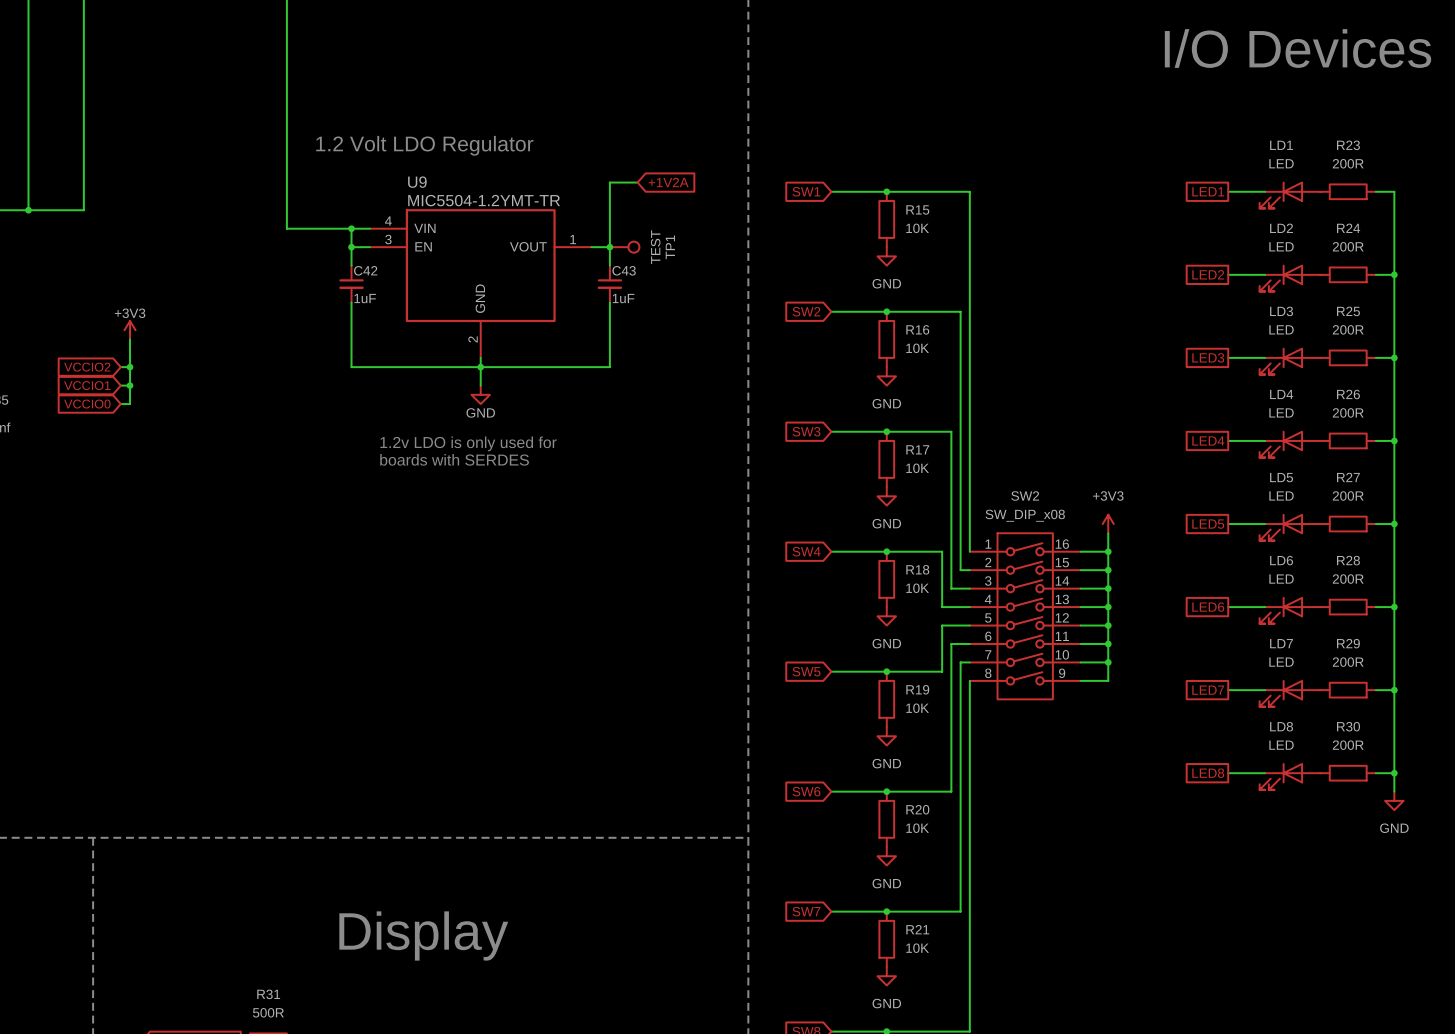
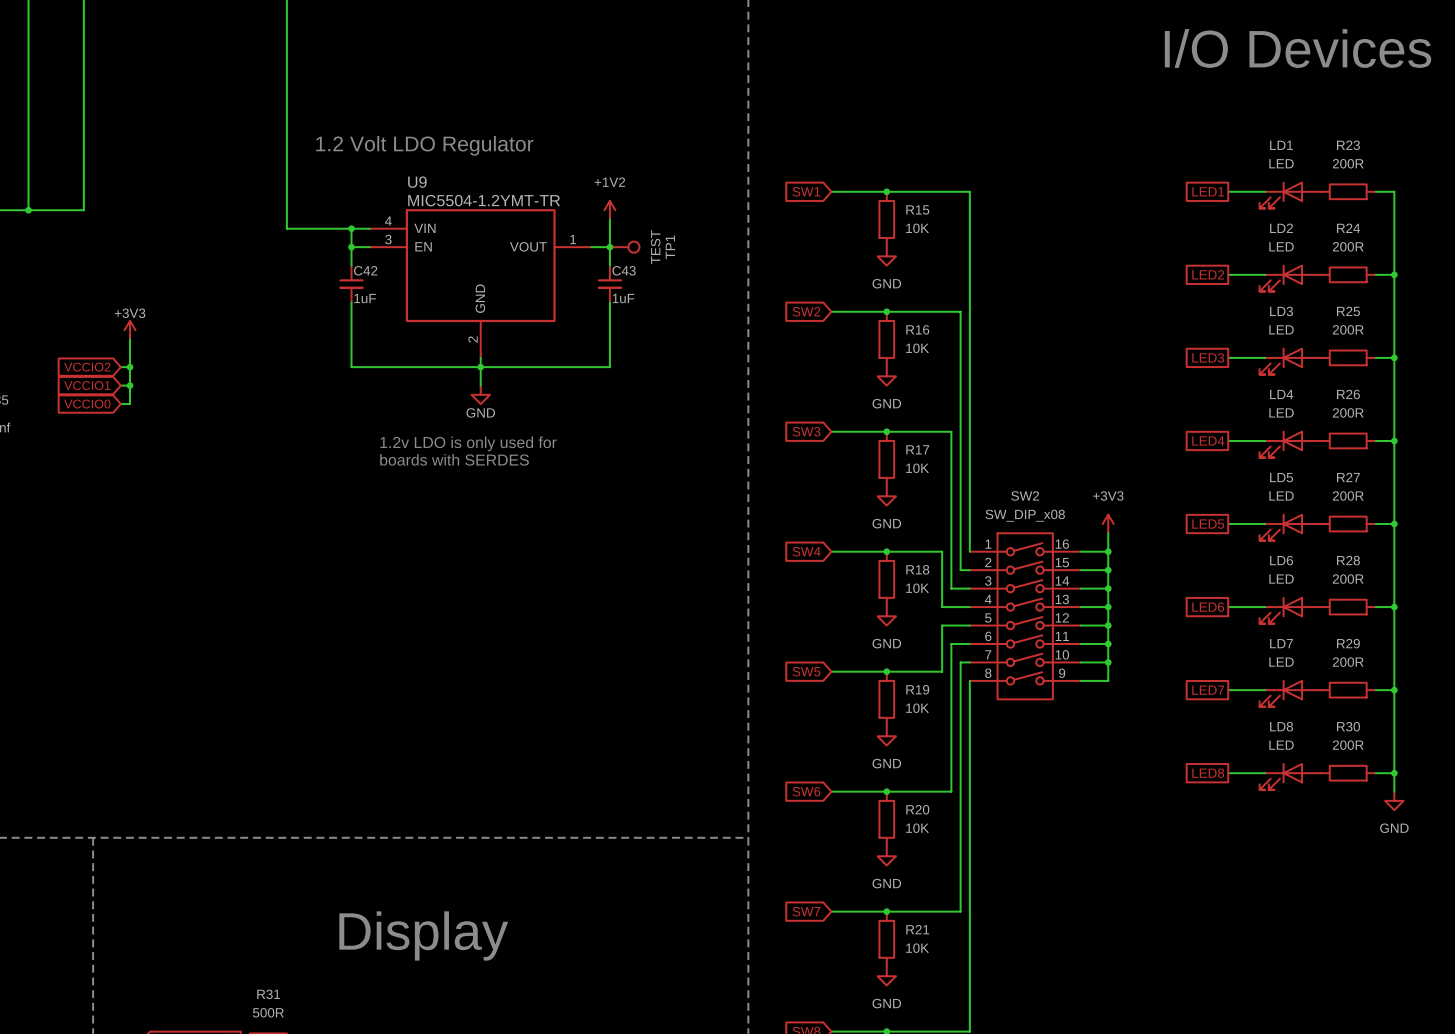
wire: (637, 182) (609, 182) (609, 219) -> none
global label: +1V2A (668, 182) -> none
power symbol: none -> +1V2 (609, 210)

